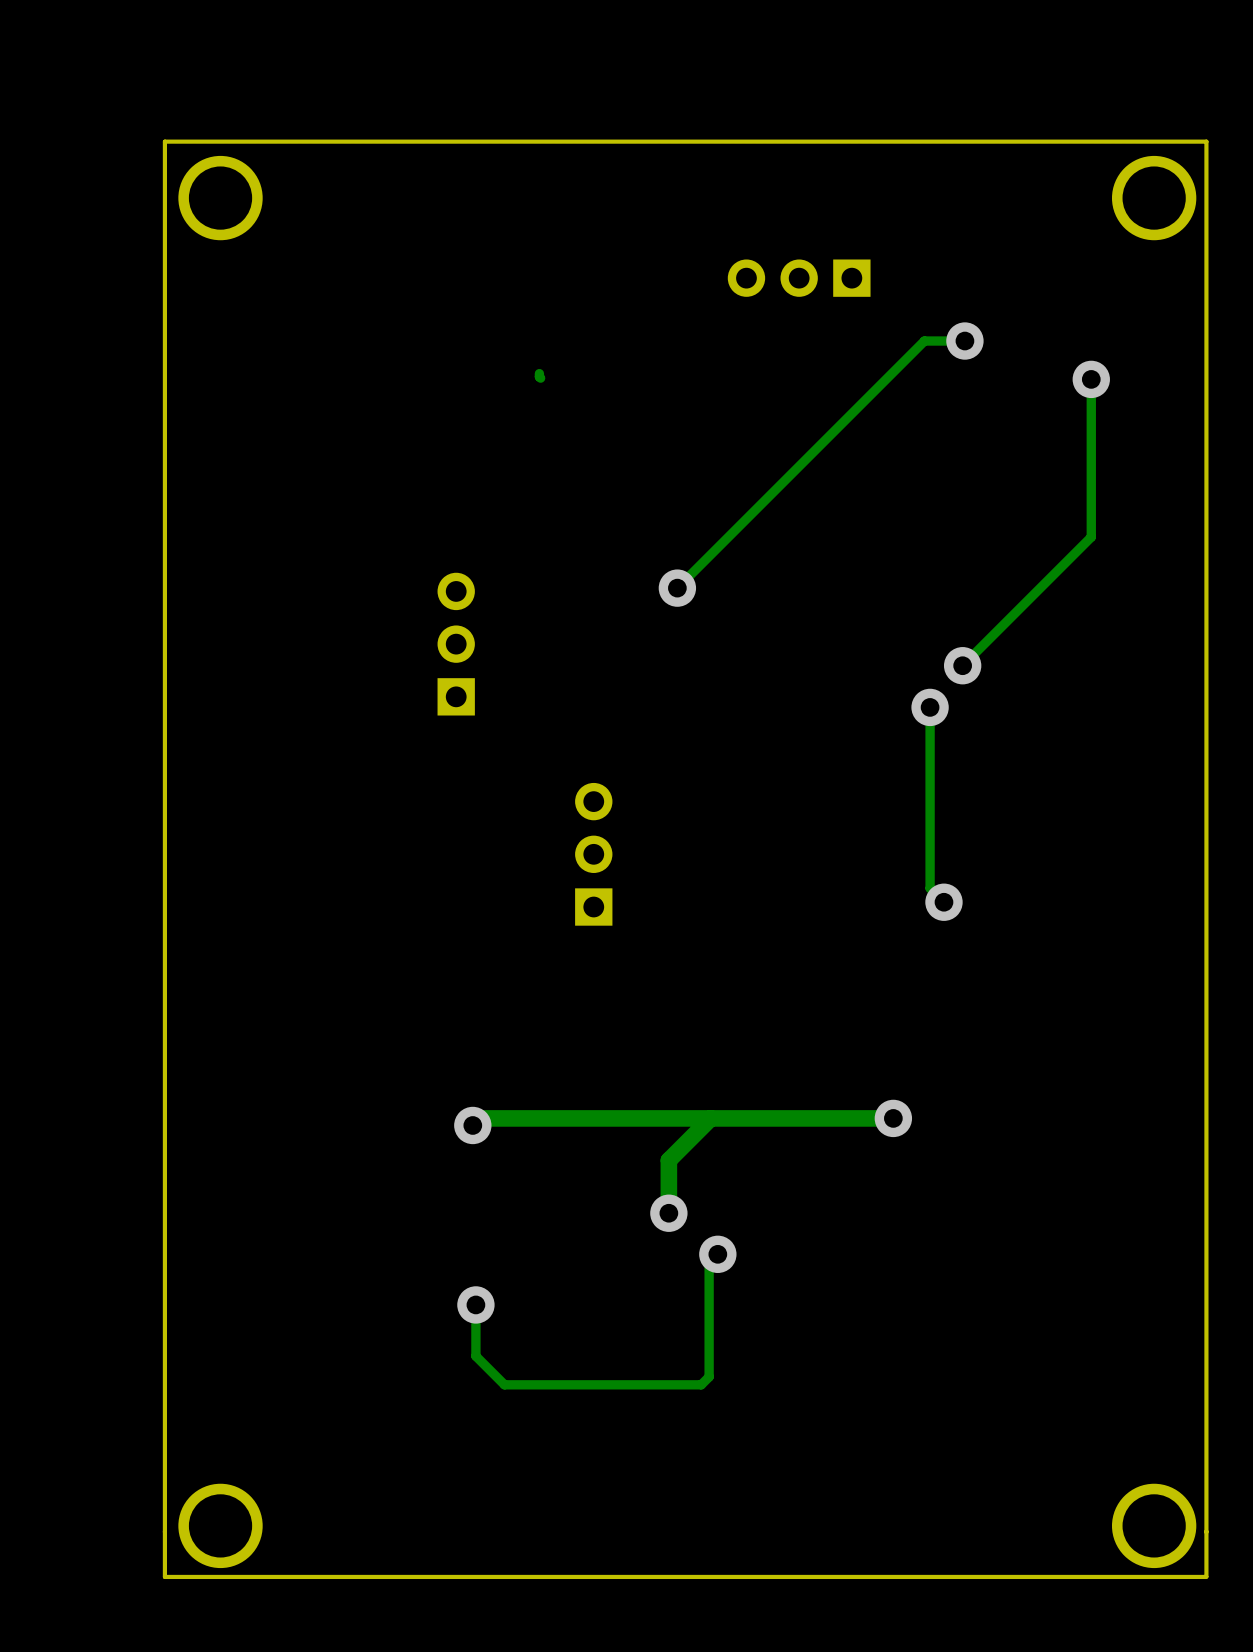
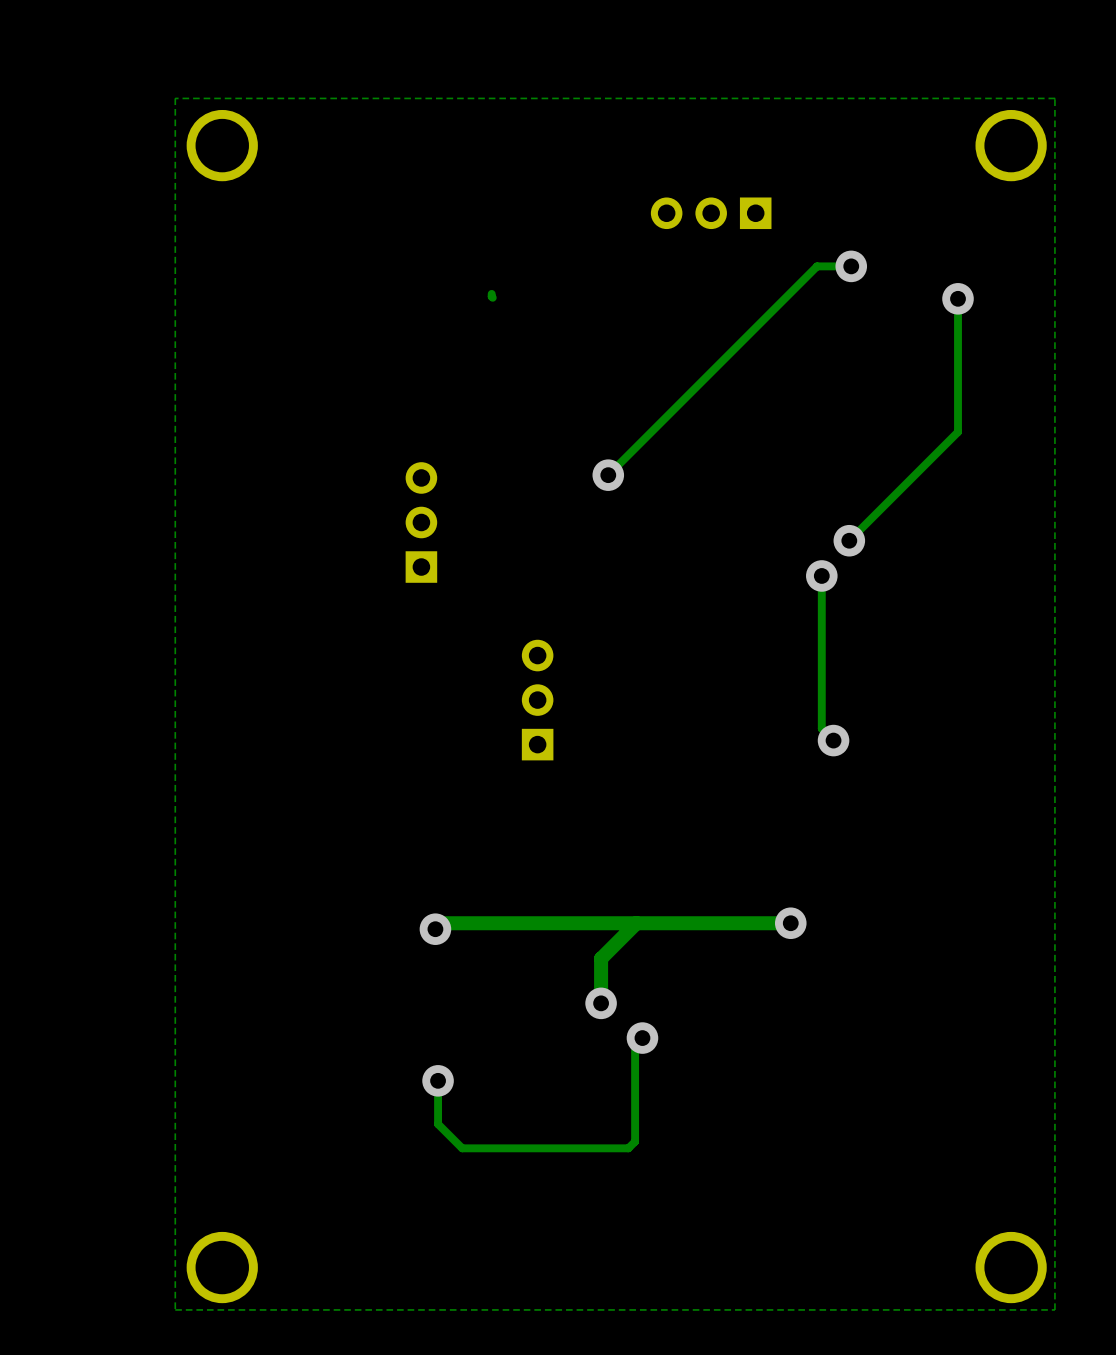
board edge: (1206, 1576) (1206, 141) (164, 141) (164, 1576) (1206, 1576) -> none

